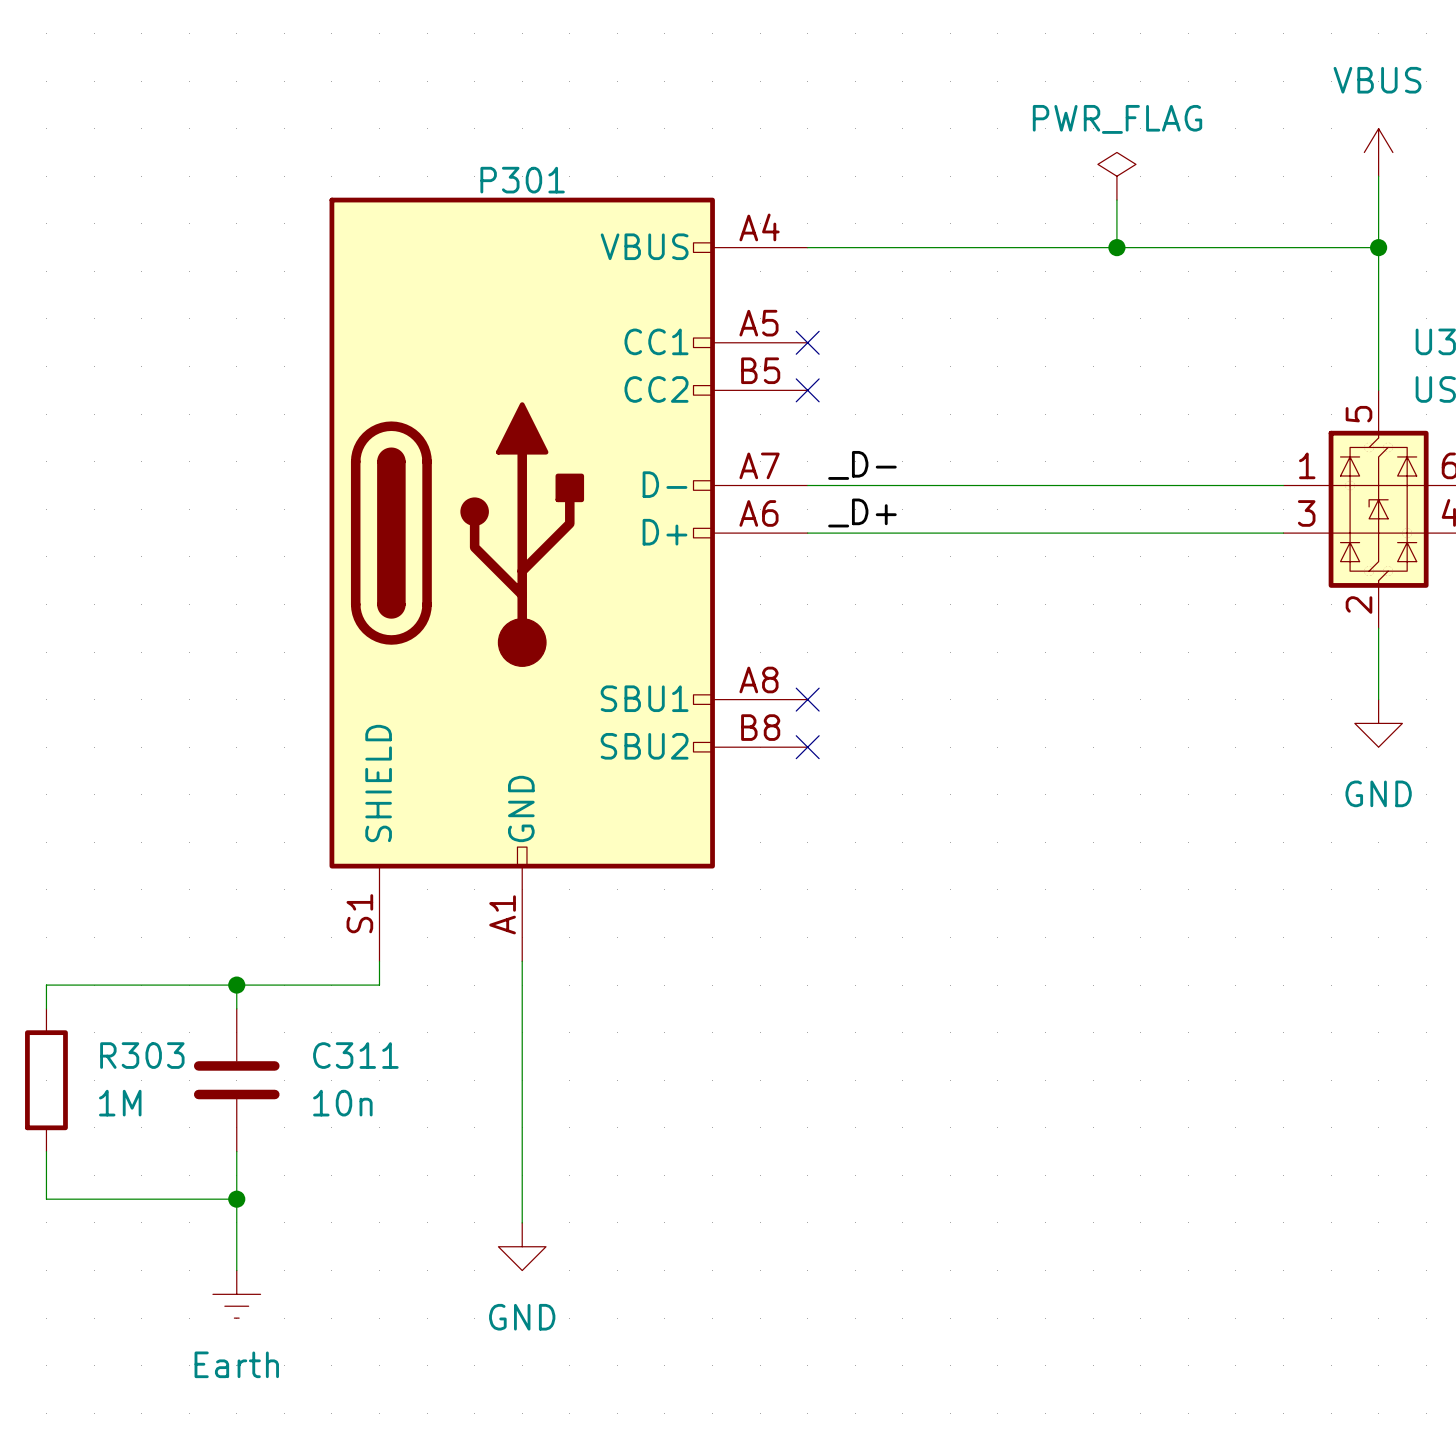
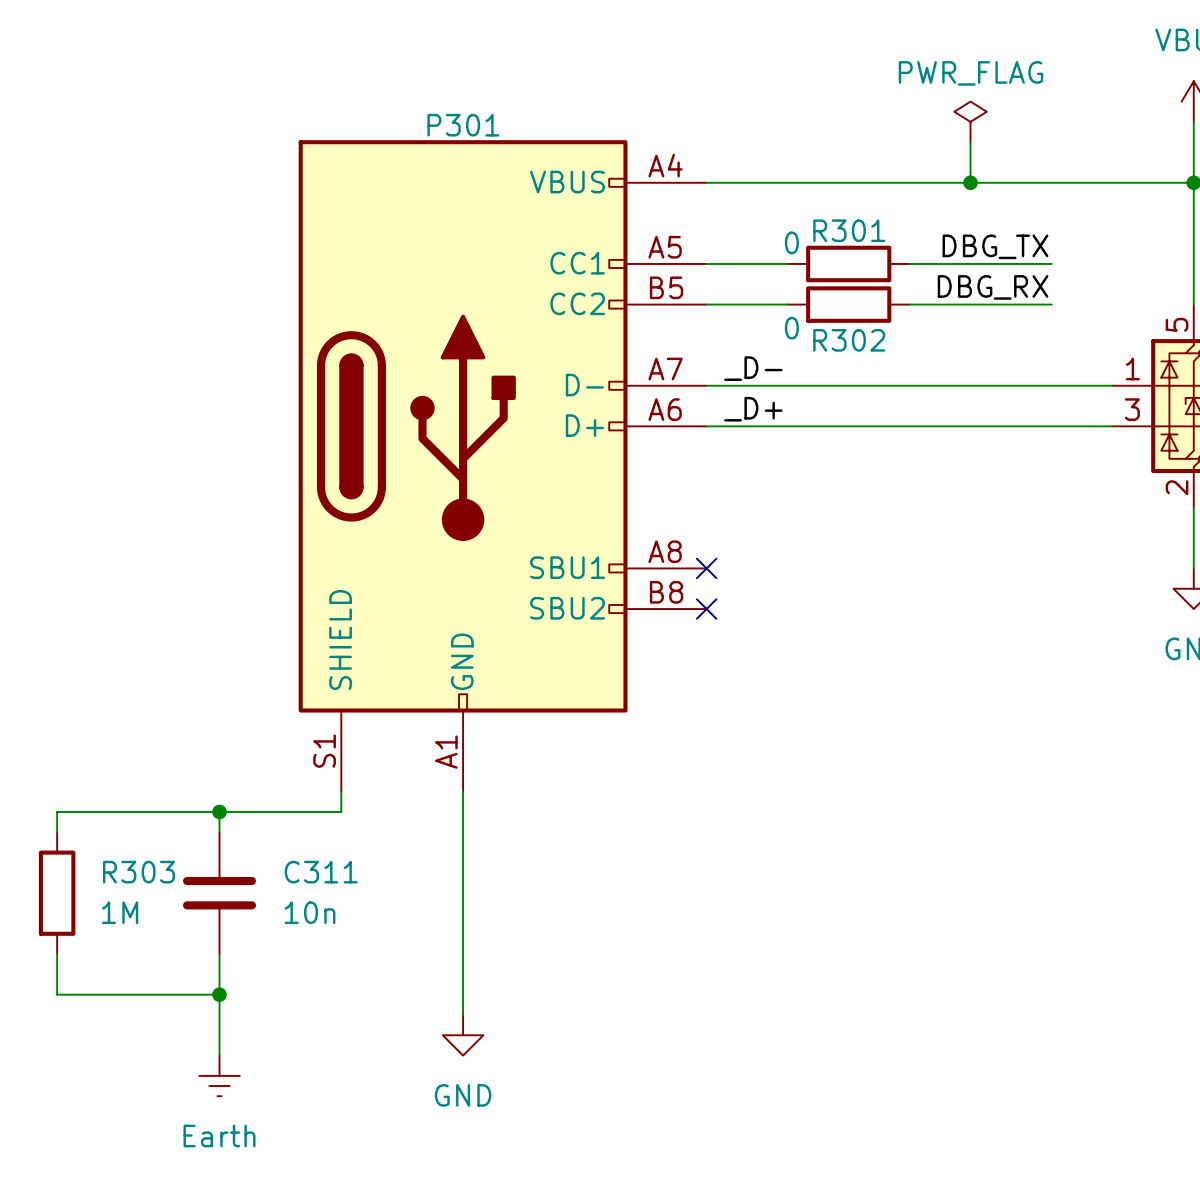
label: none -> DBG_TX (995, 246)
wire: none -> (706, 263) (787, 263)
no-connect mark: (807, 342) -> none
R301: none -> 0 (848, 263)
wire: none -> (909, 263) (1051, 263)
label: none -> DBG_RX (993, 287)
wire: none -> (706, 304) (787, 304)
no-connect mark: (807, 390) -> none
R302: none -> 0 (848, 304)
wire: none -> (909, 304) (1051, 304)

